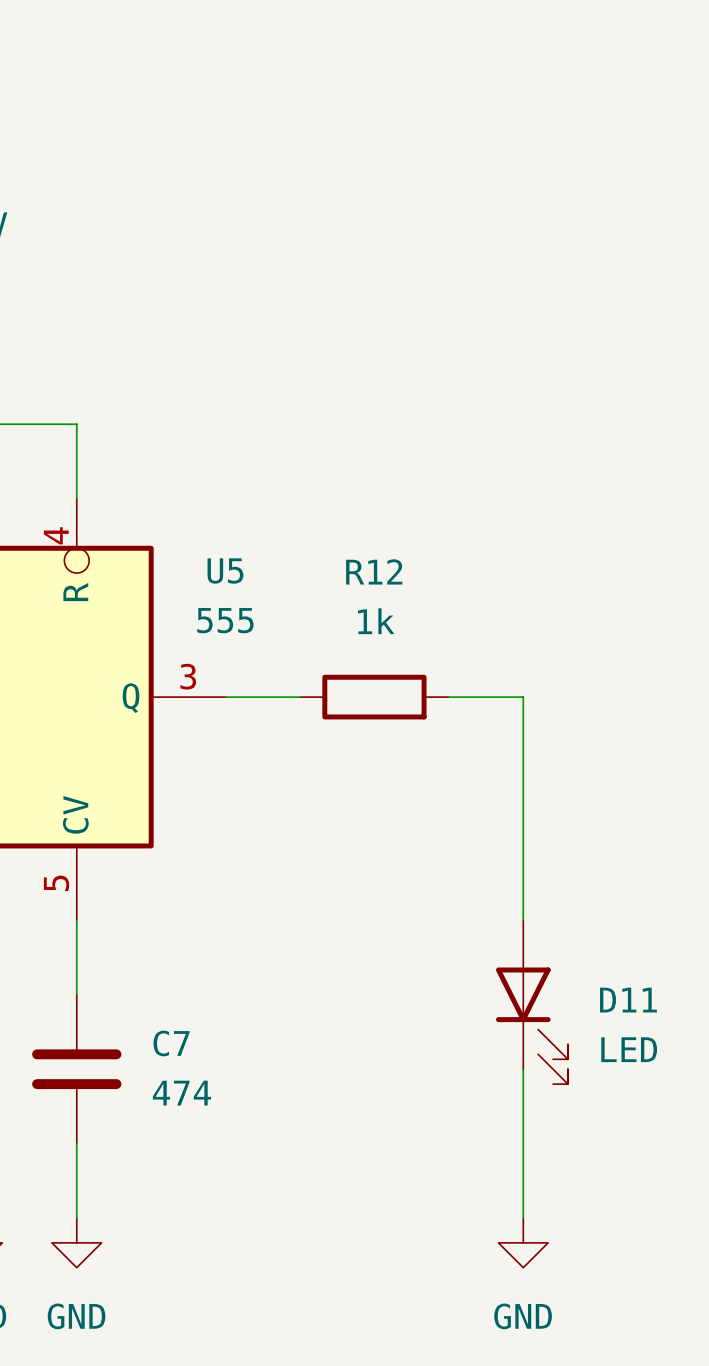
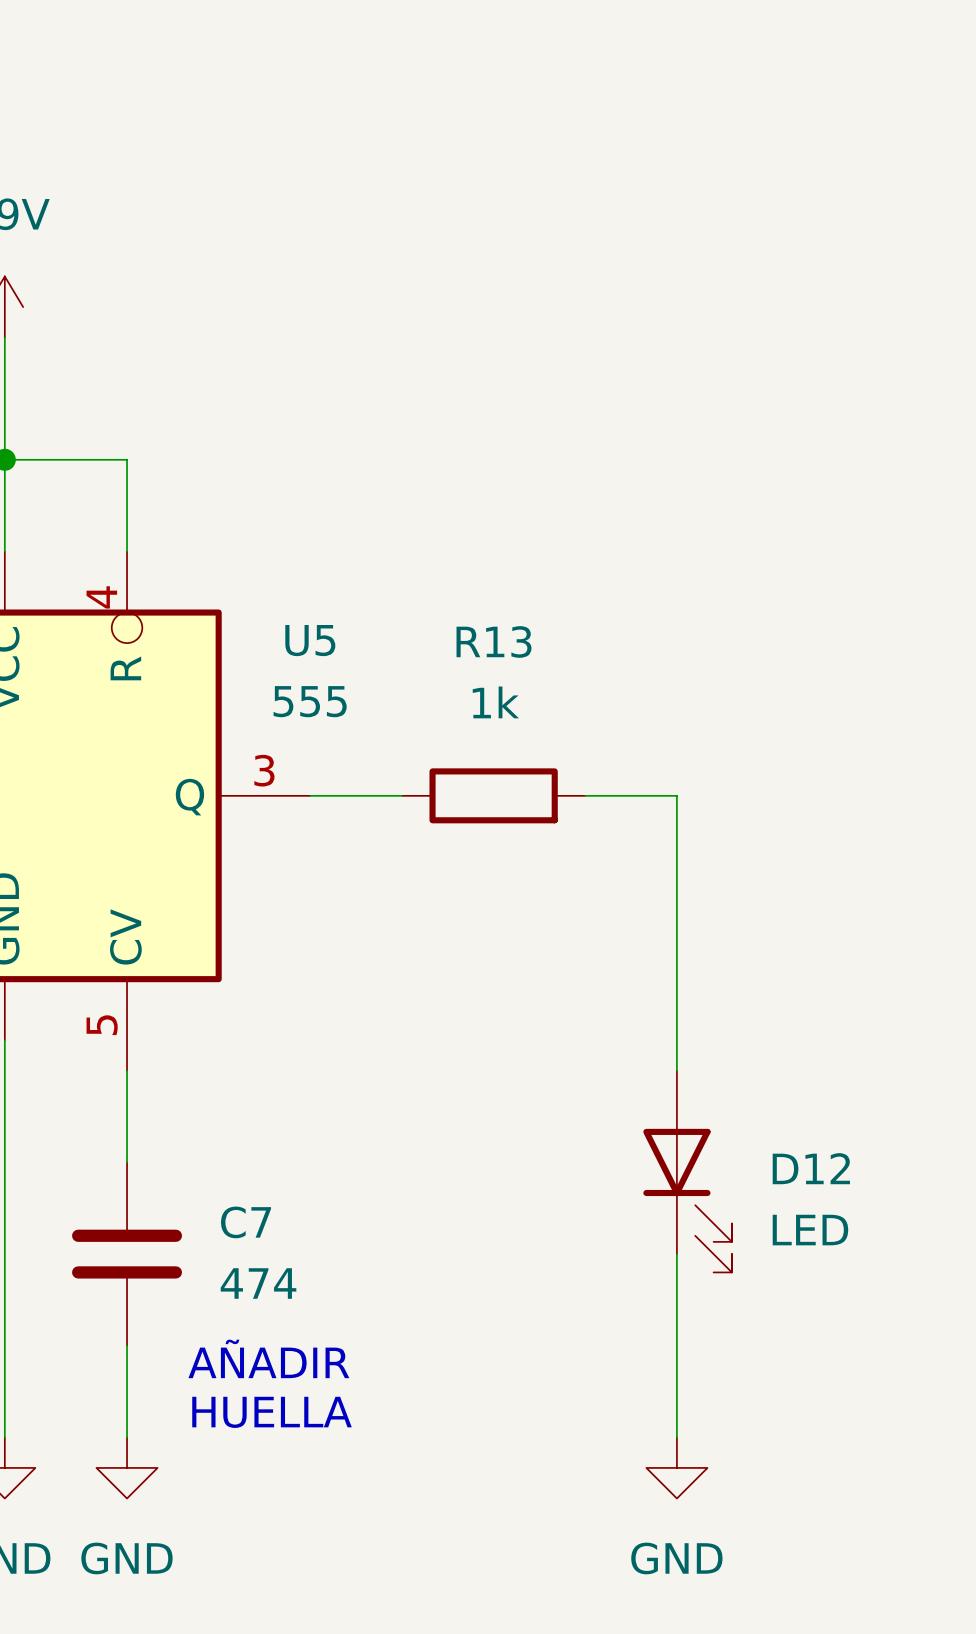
R12 name: R12 (374, 571) -> R13 (494, 641)
D11 name: D11 (628, 1000) -> D12 (811, 1168)
text: none -> AÑADIR (268, 1358)
text: none -> HUELLA (272, 1412)

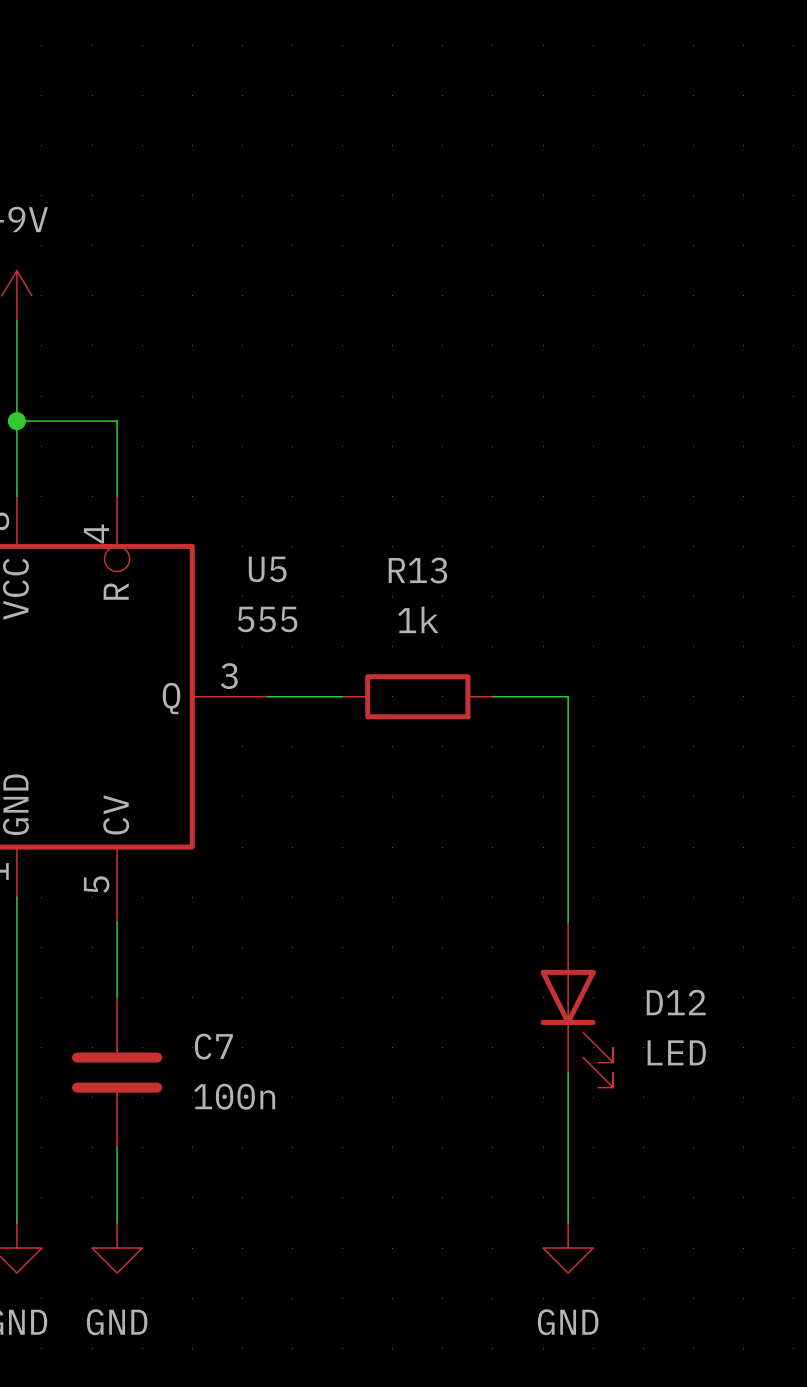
C7 value: 474 (258, 1283) -> 100n (234, 1096)
text: AÑADIR (268, 1358) -> none
text: HUELLA (272, 1412) -> none

